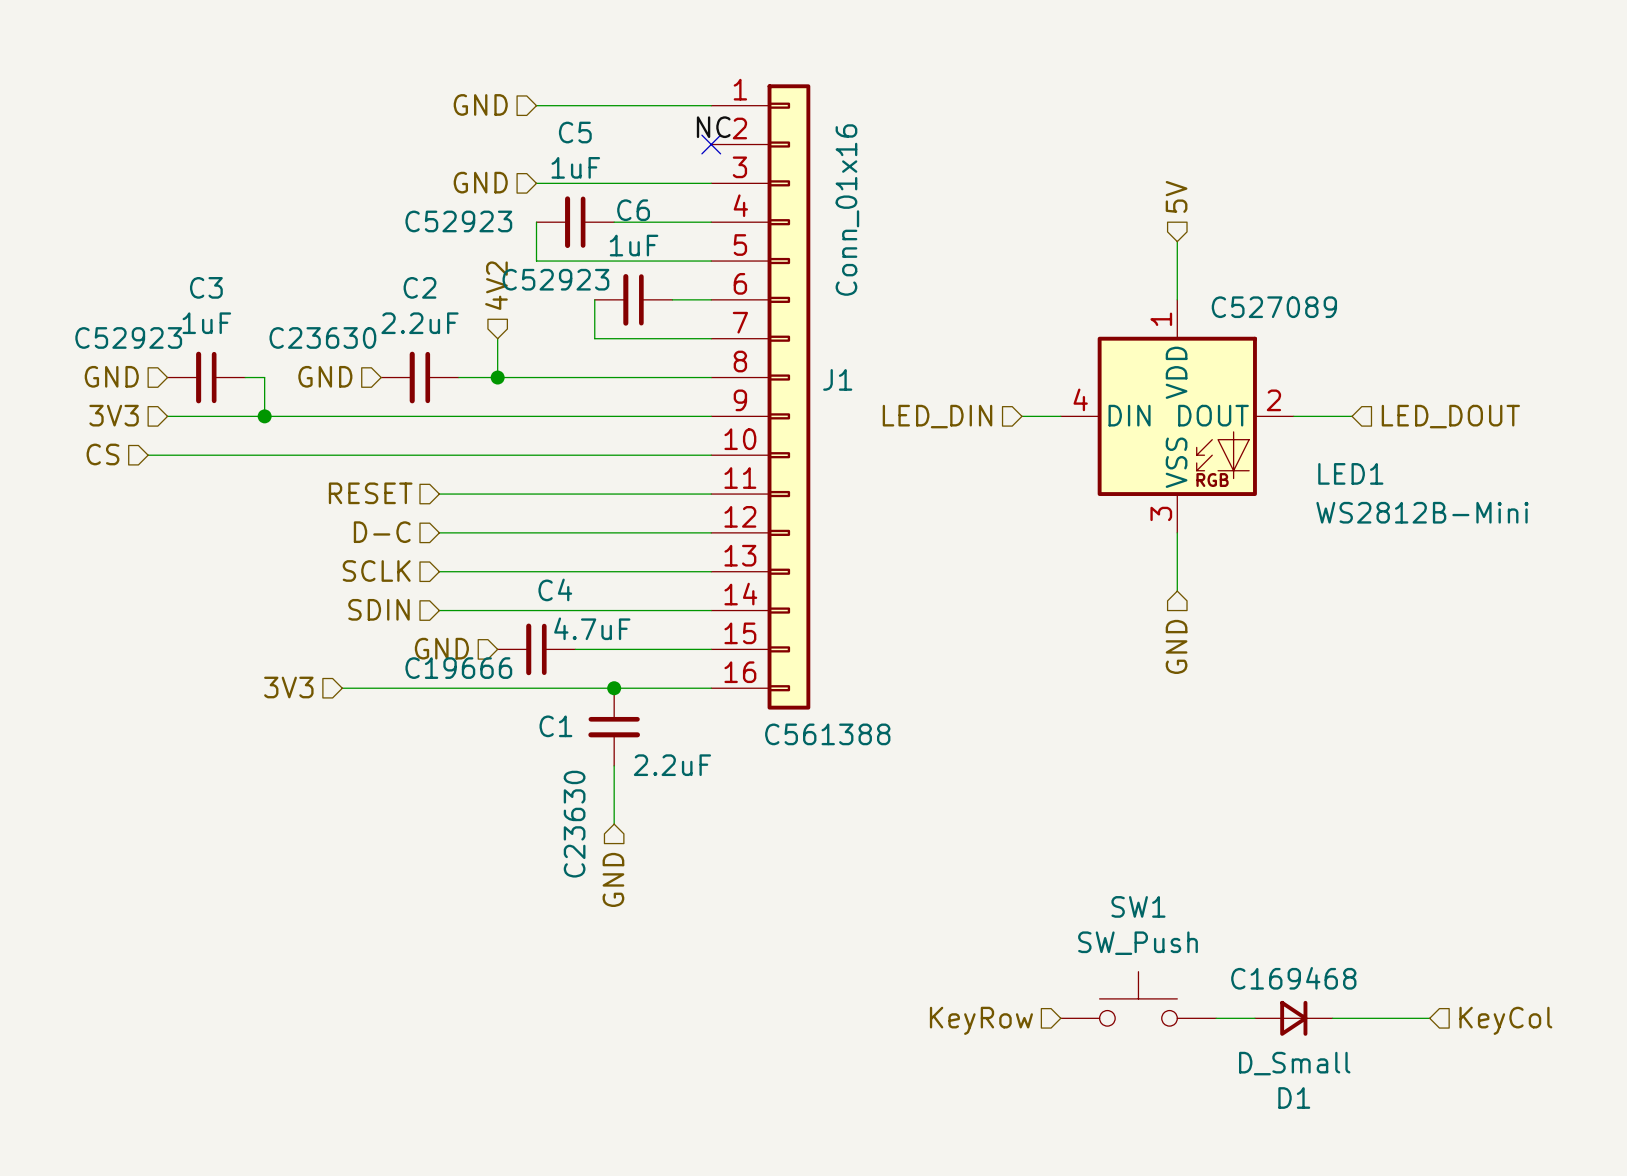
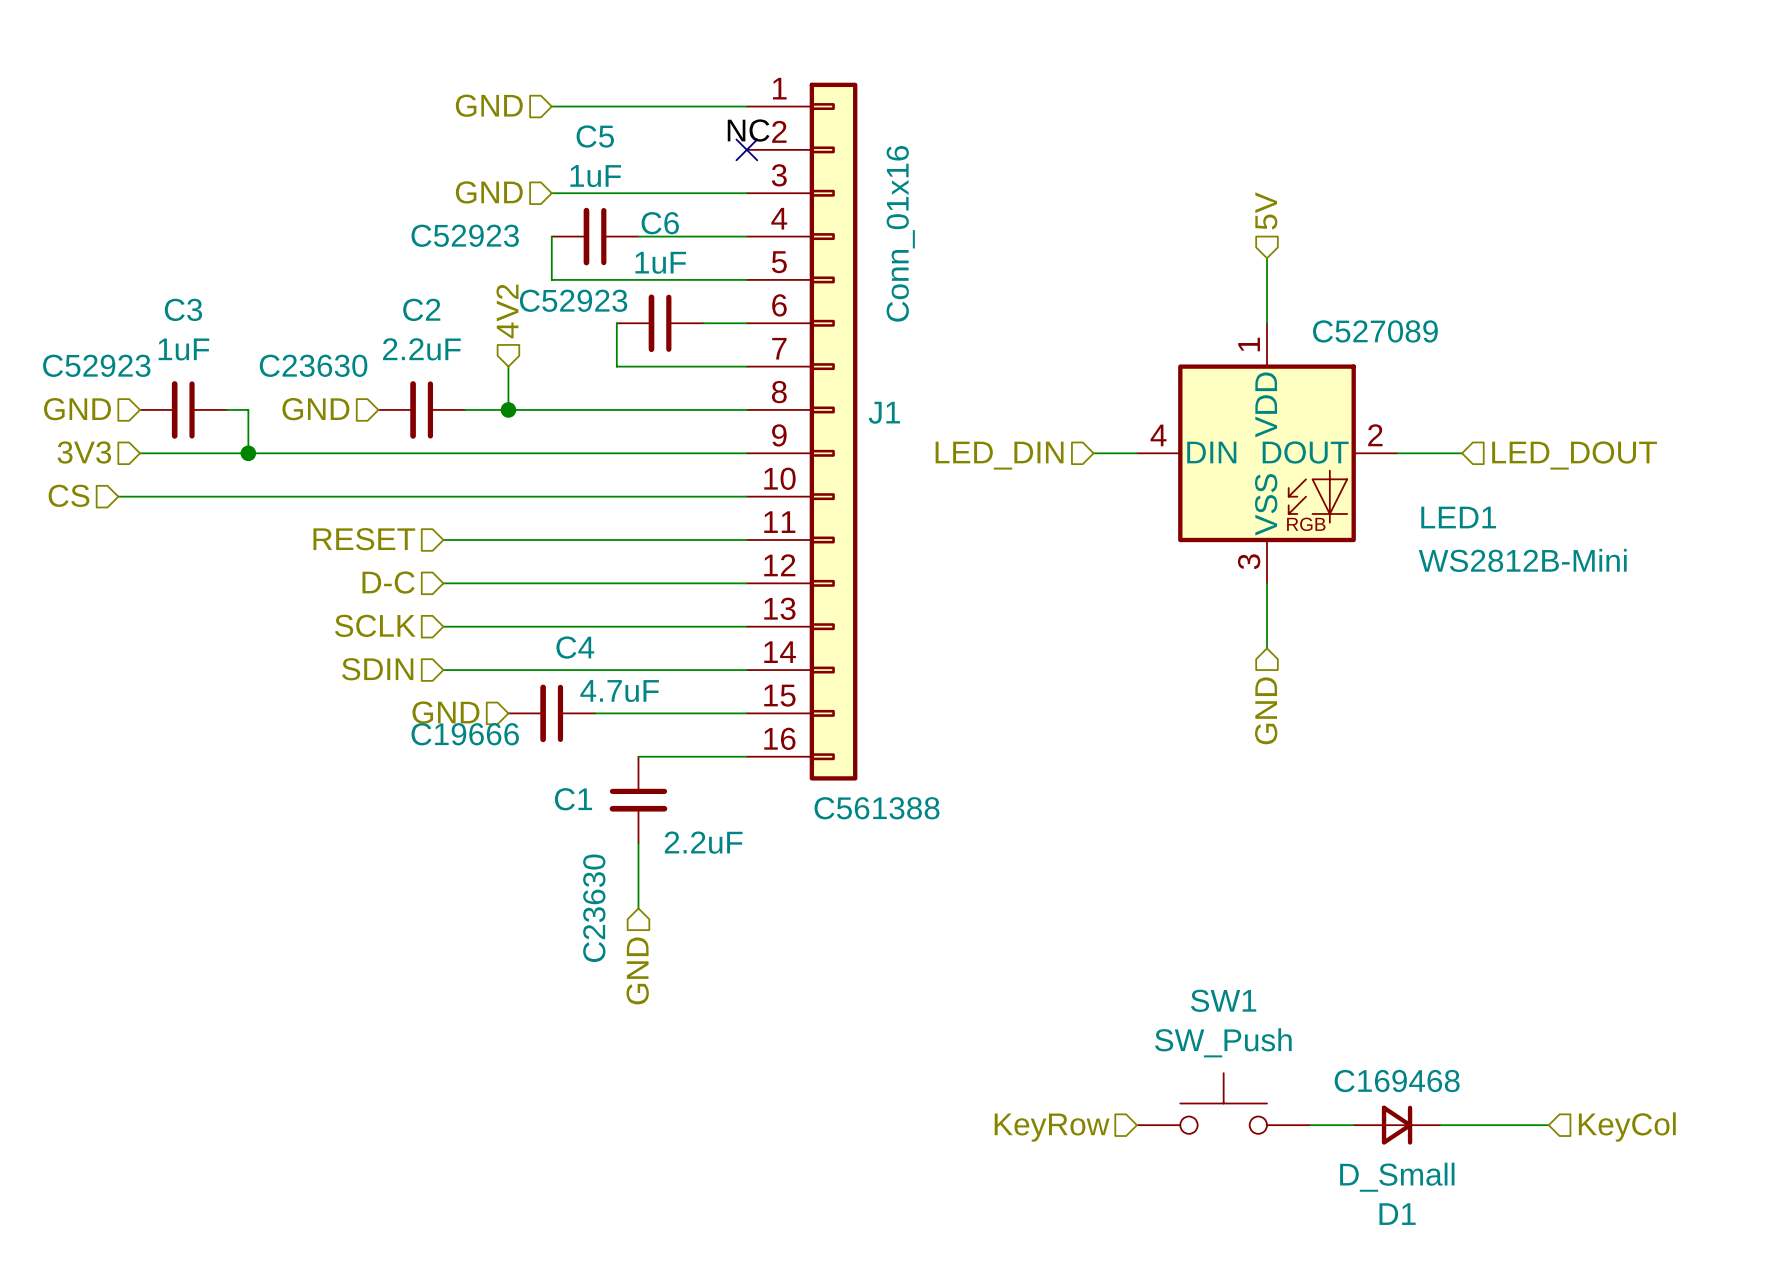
hierarchical label: 3V3 (288, 687) -> none
wire: (342, 688) (614, 688) -> none
junction: (614, 688) -> none

